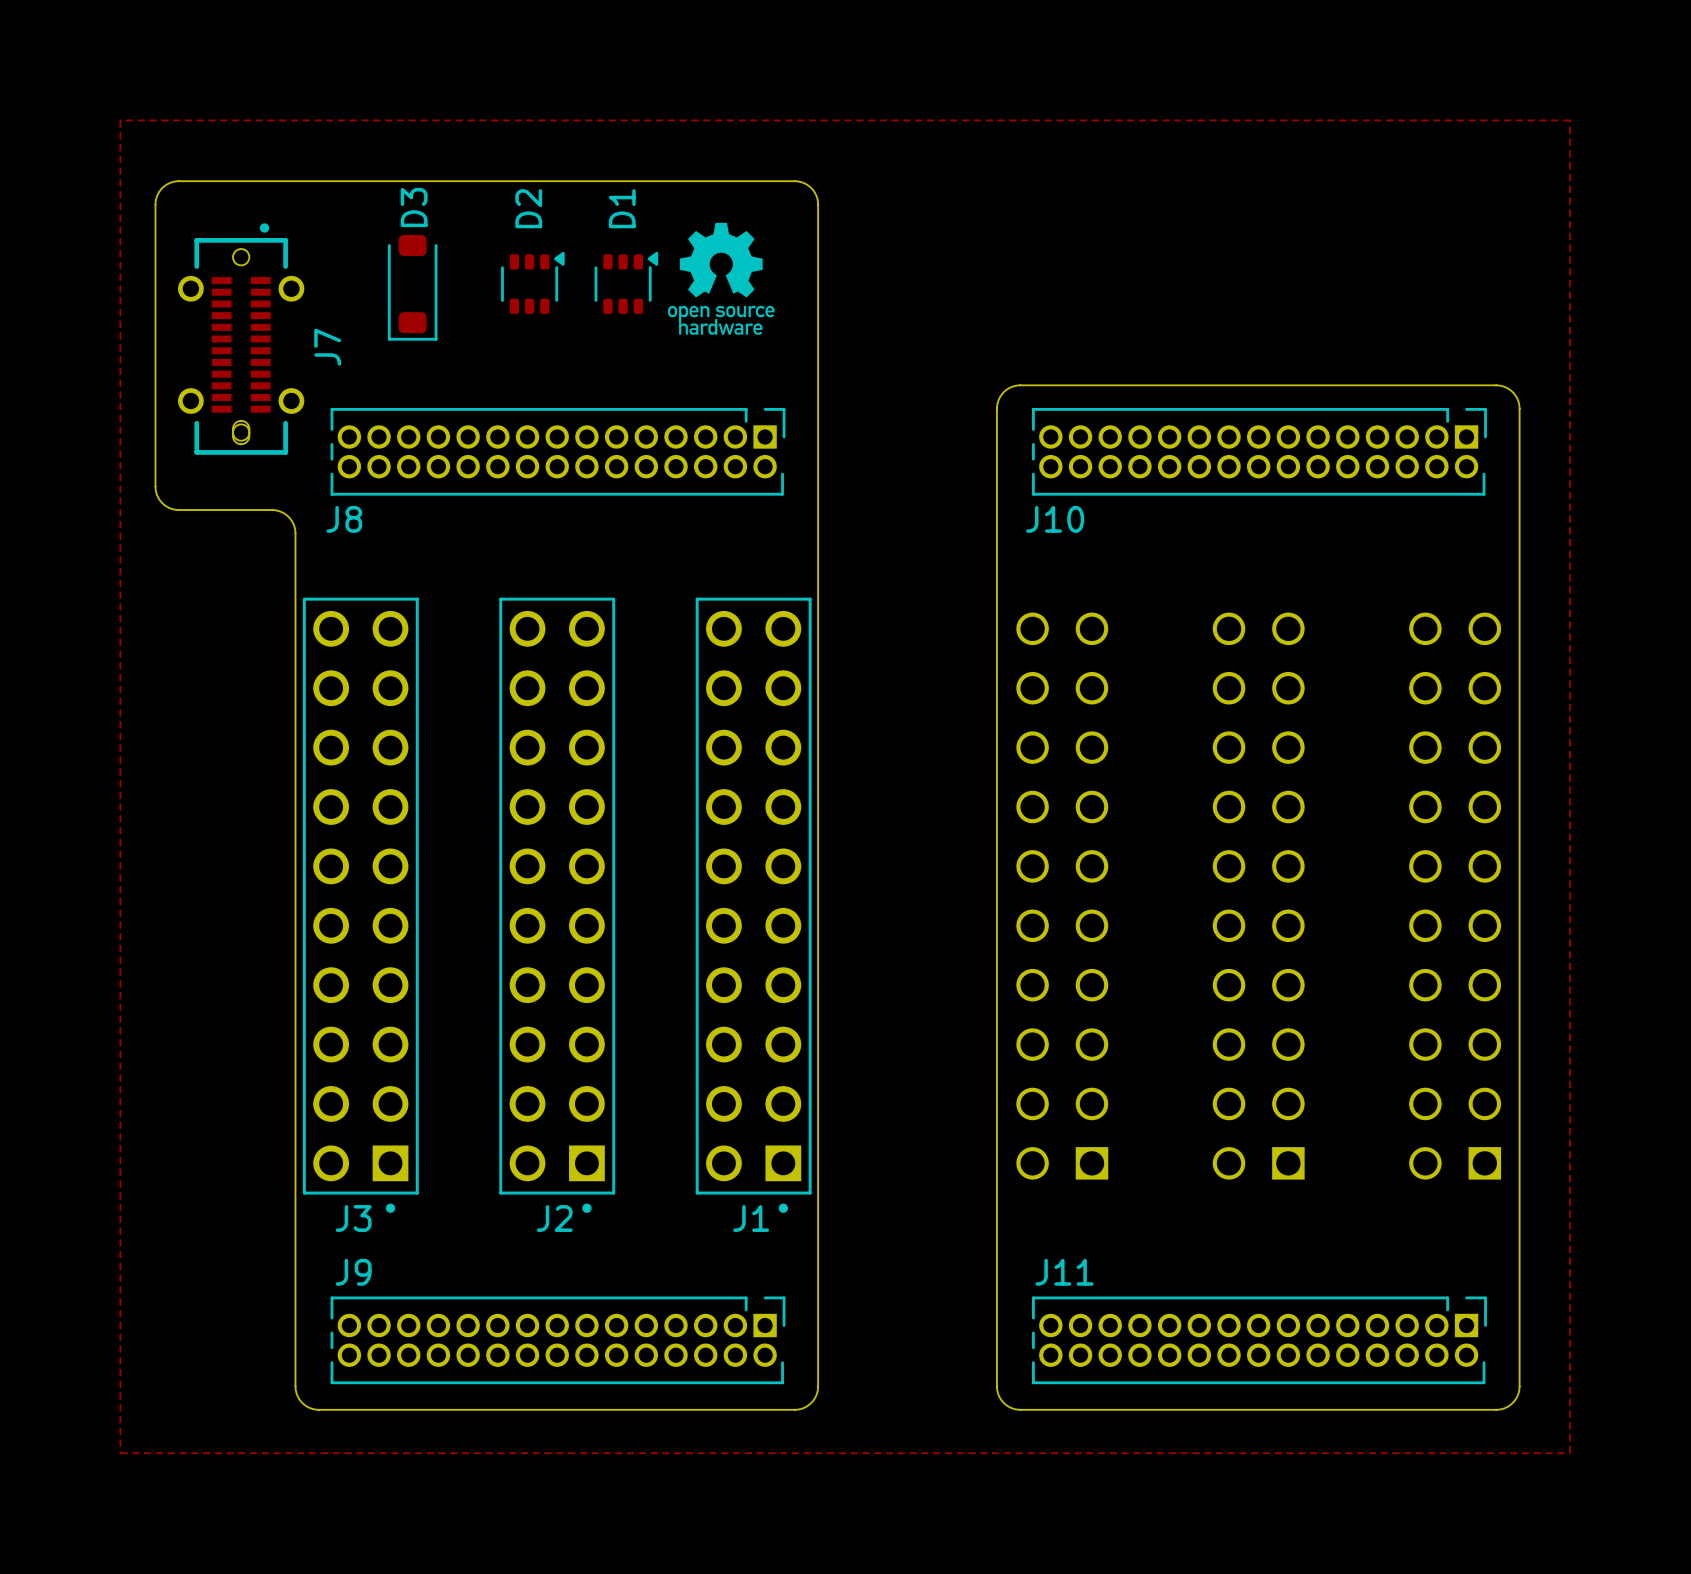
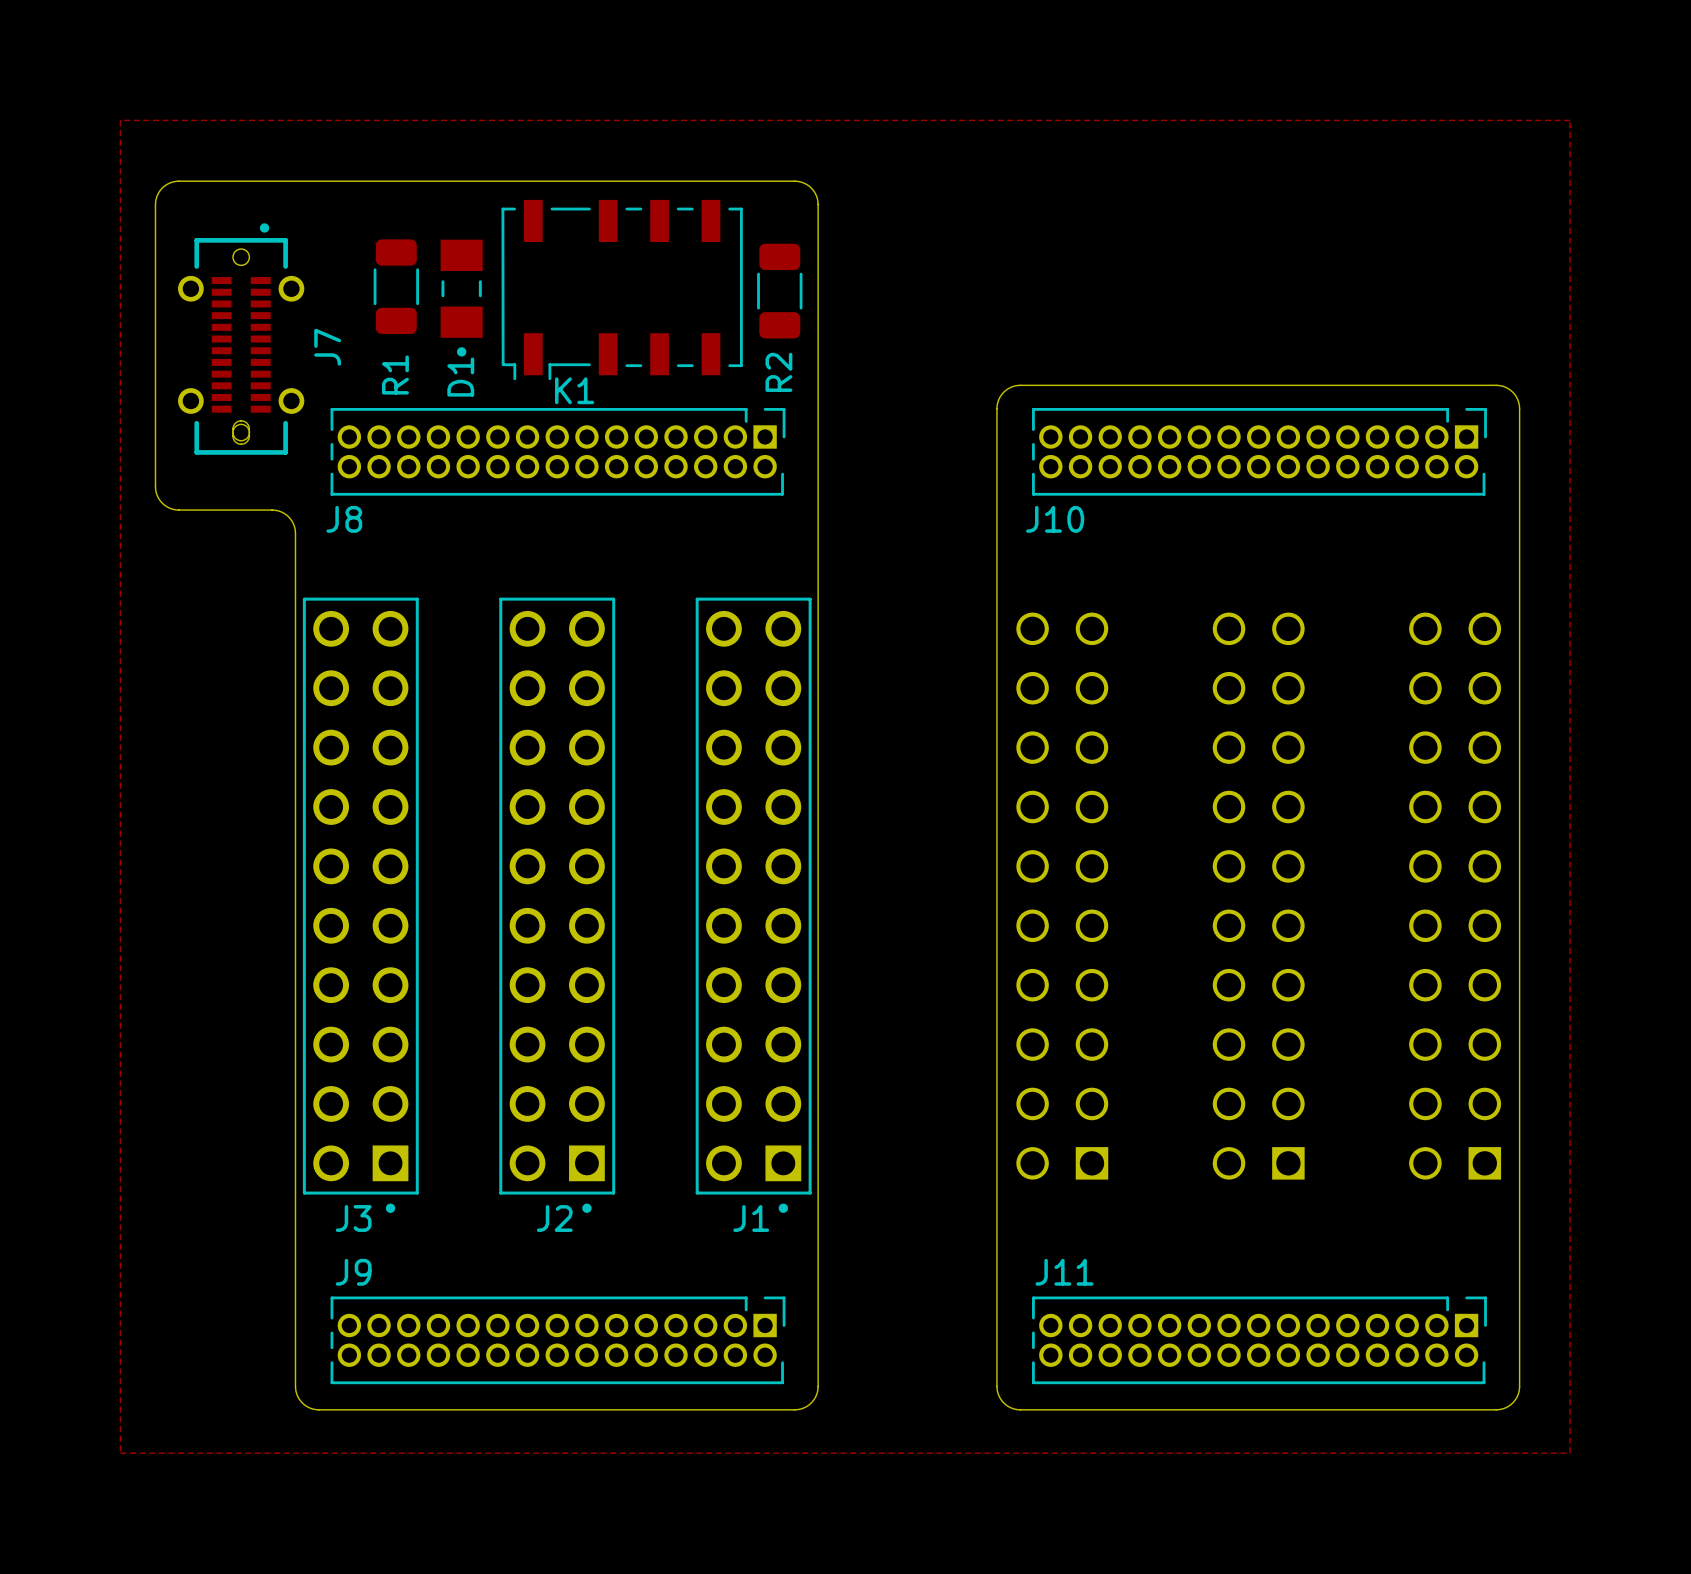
D1 name position: D1 (622, 208) -> D1 (460, 377)
drawing: [668, 222, 775, 335] -> none
D1 footprint: [594, 251, 659, 314] -> [440, 239, 483, 357]
D2: (532, 282) -> none
R1: none -> (396, 286)
D3: (412, 287) -> none
K1: none -> (622, 290)
R2: none -> (779, 291)

